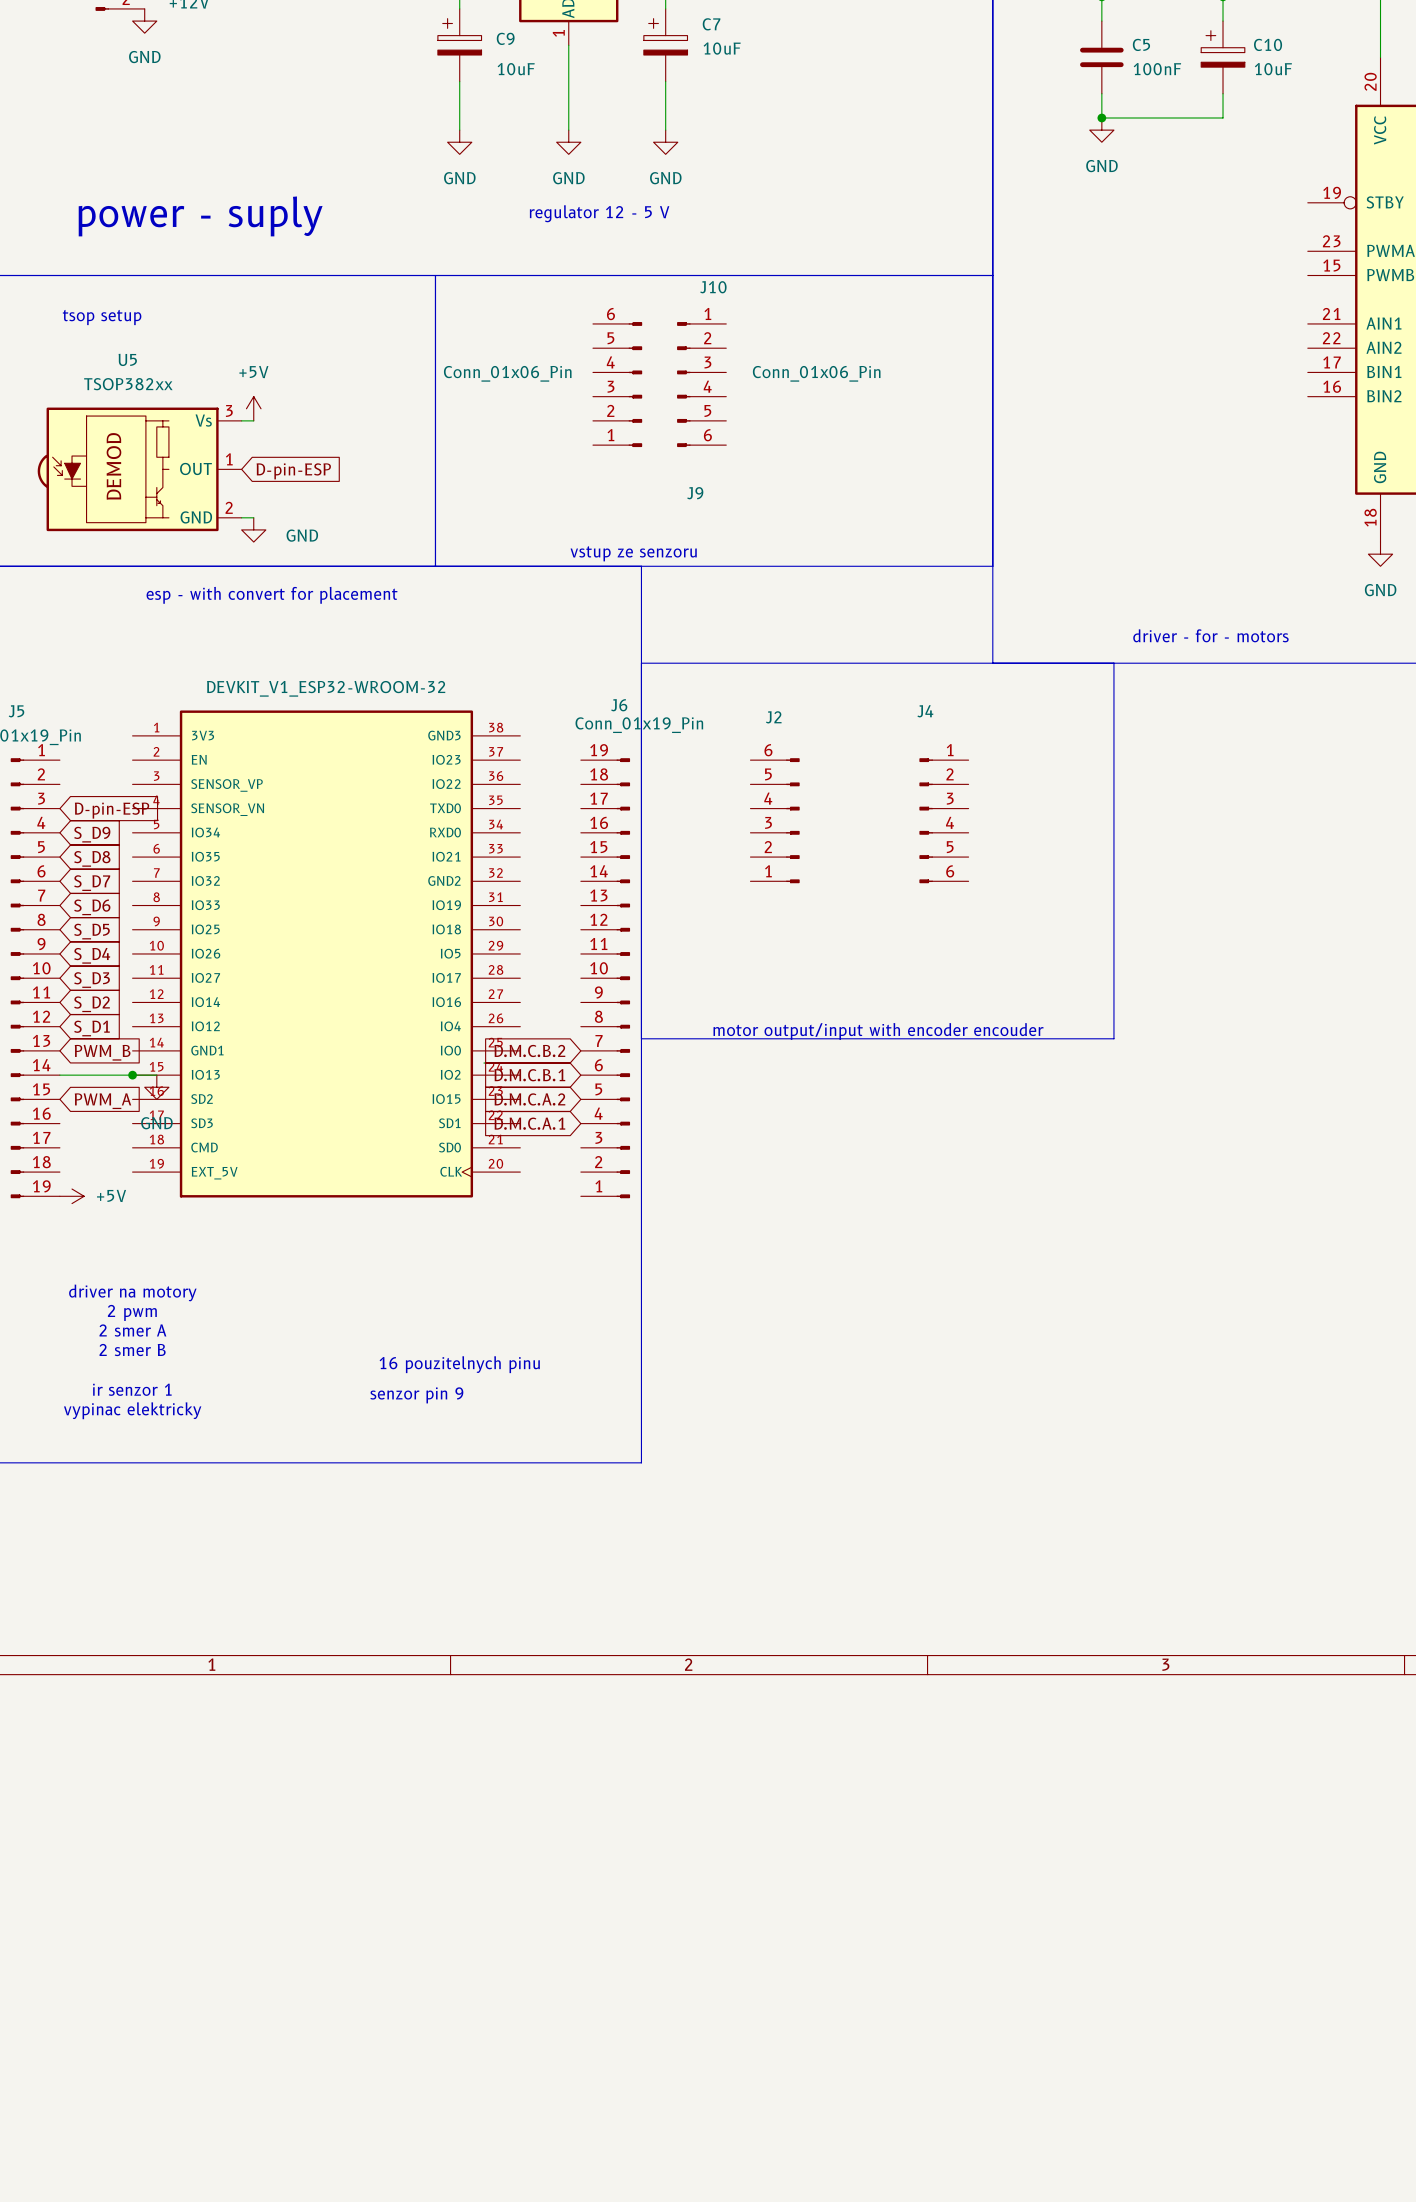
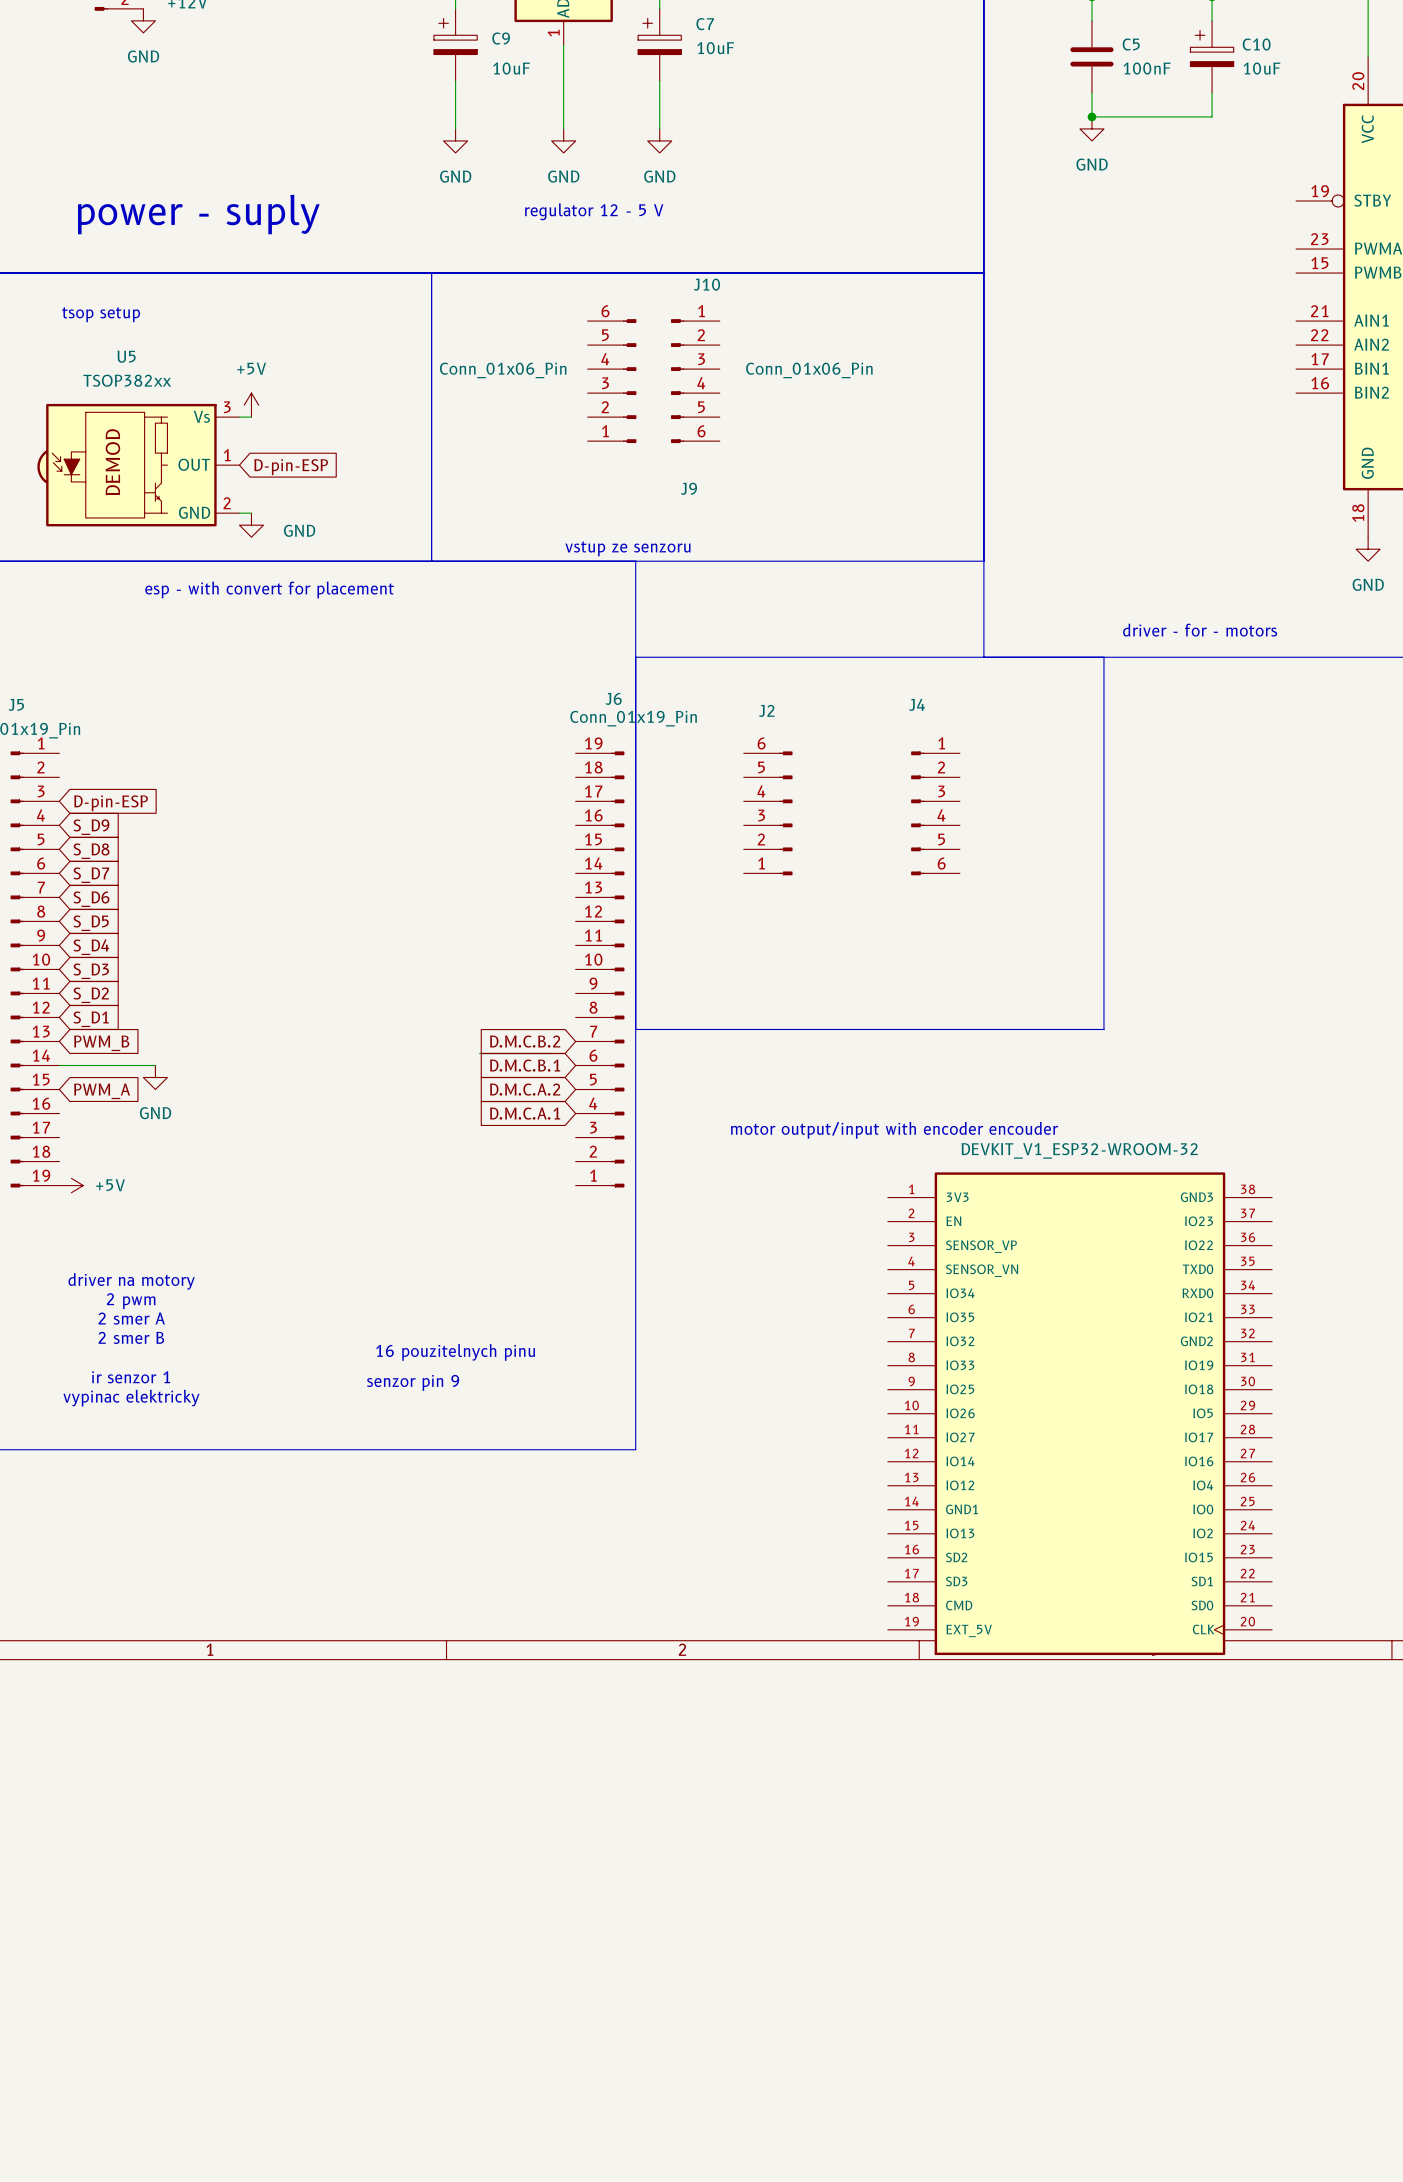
part: DEVKIT_V1_ESP32-WROOM-32 (326, 953) -> none
text position: motor output/input with encoder encouder (878, 1031) -> motor output/input with encoder encouder (894, 1130)
junction: (132, 1075) -> none
part: none -> DEVKIT_V1_ESP32-WROOM-32 (1079, 1413)

